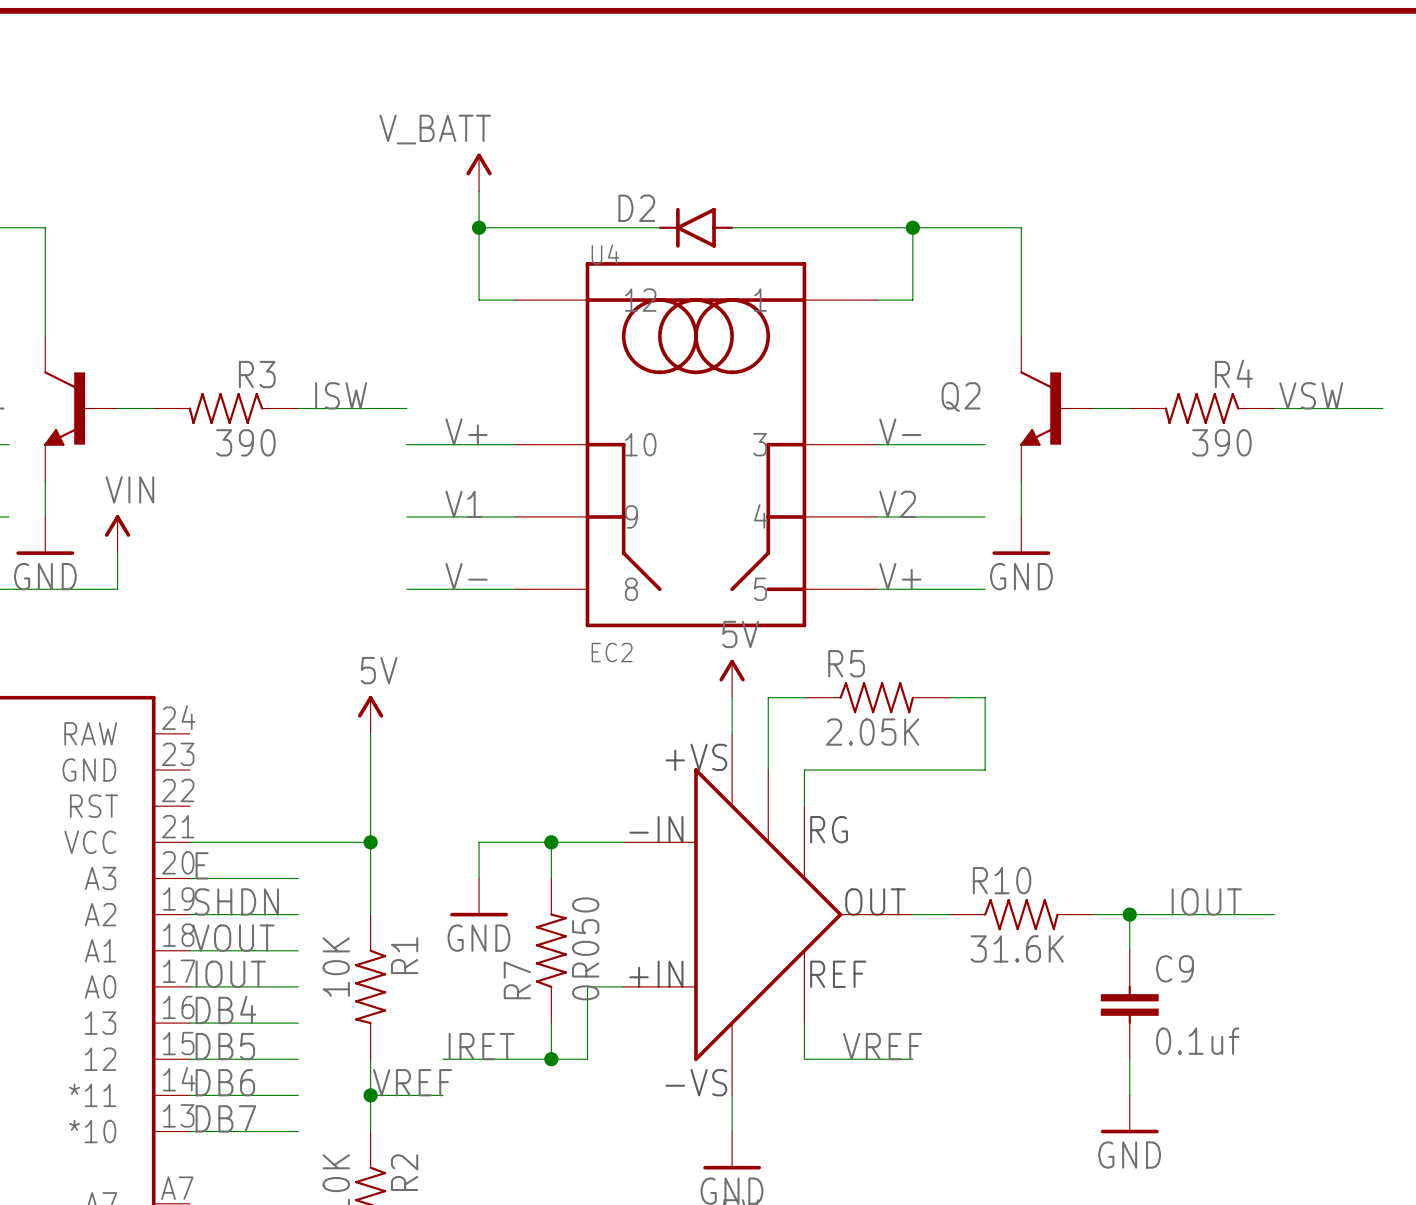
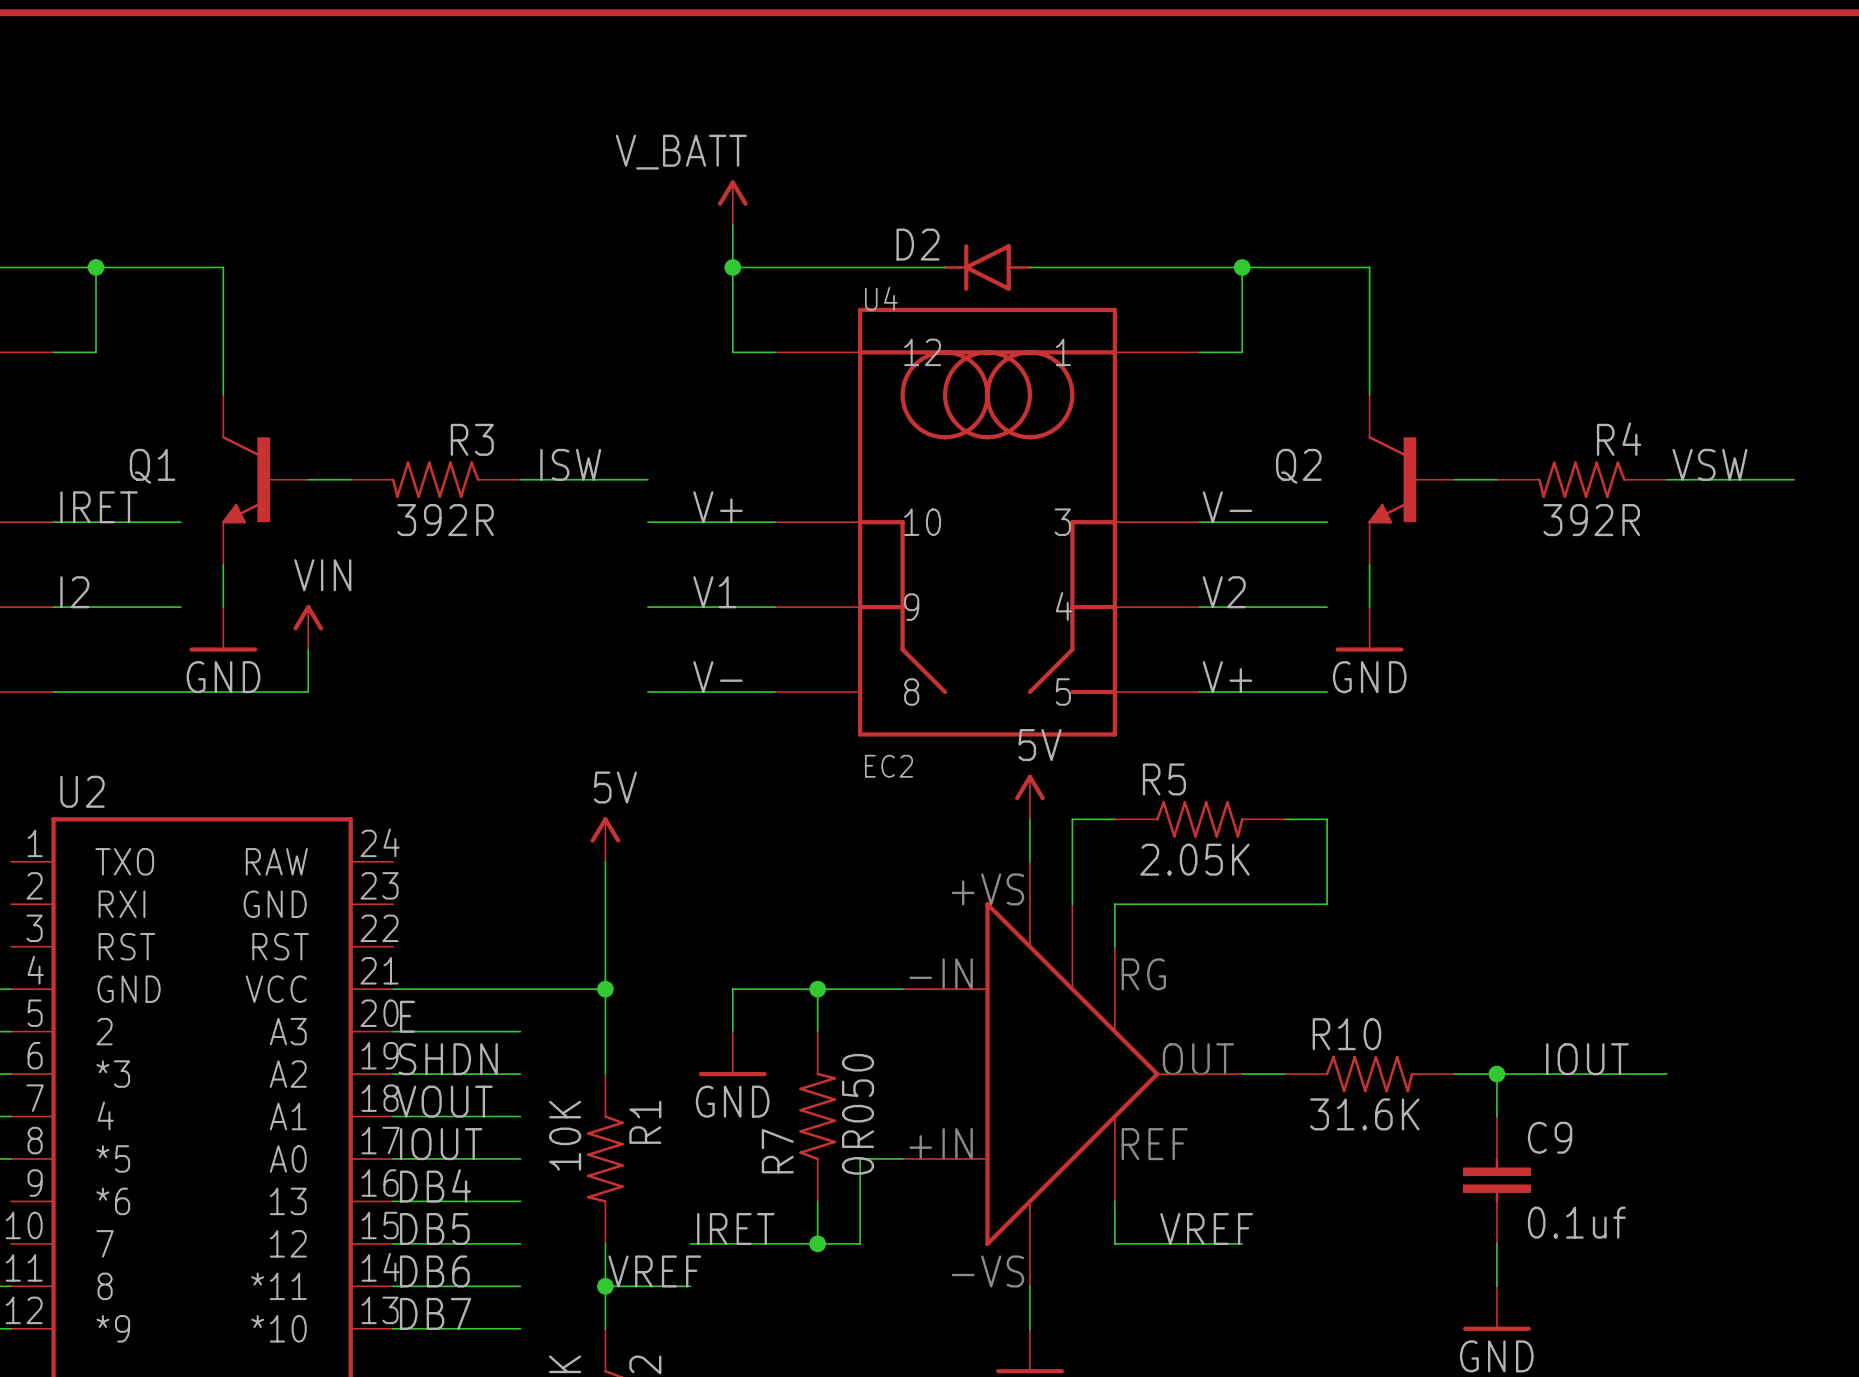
R3 value: 390 (245, 442) -> 392R (445, 520)
R4 value: 390 (1221, 442) -> 392R (1591, 520)

